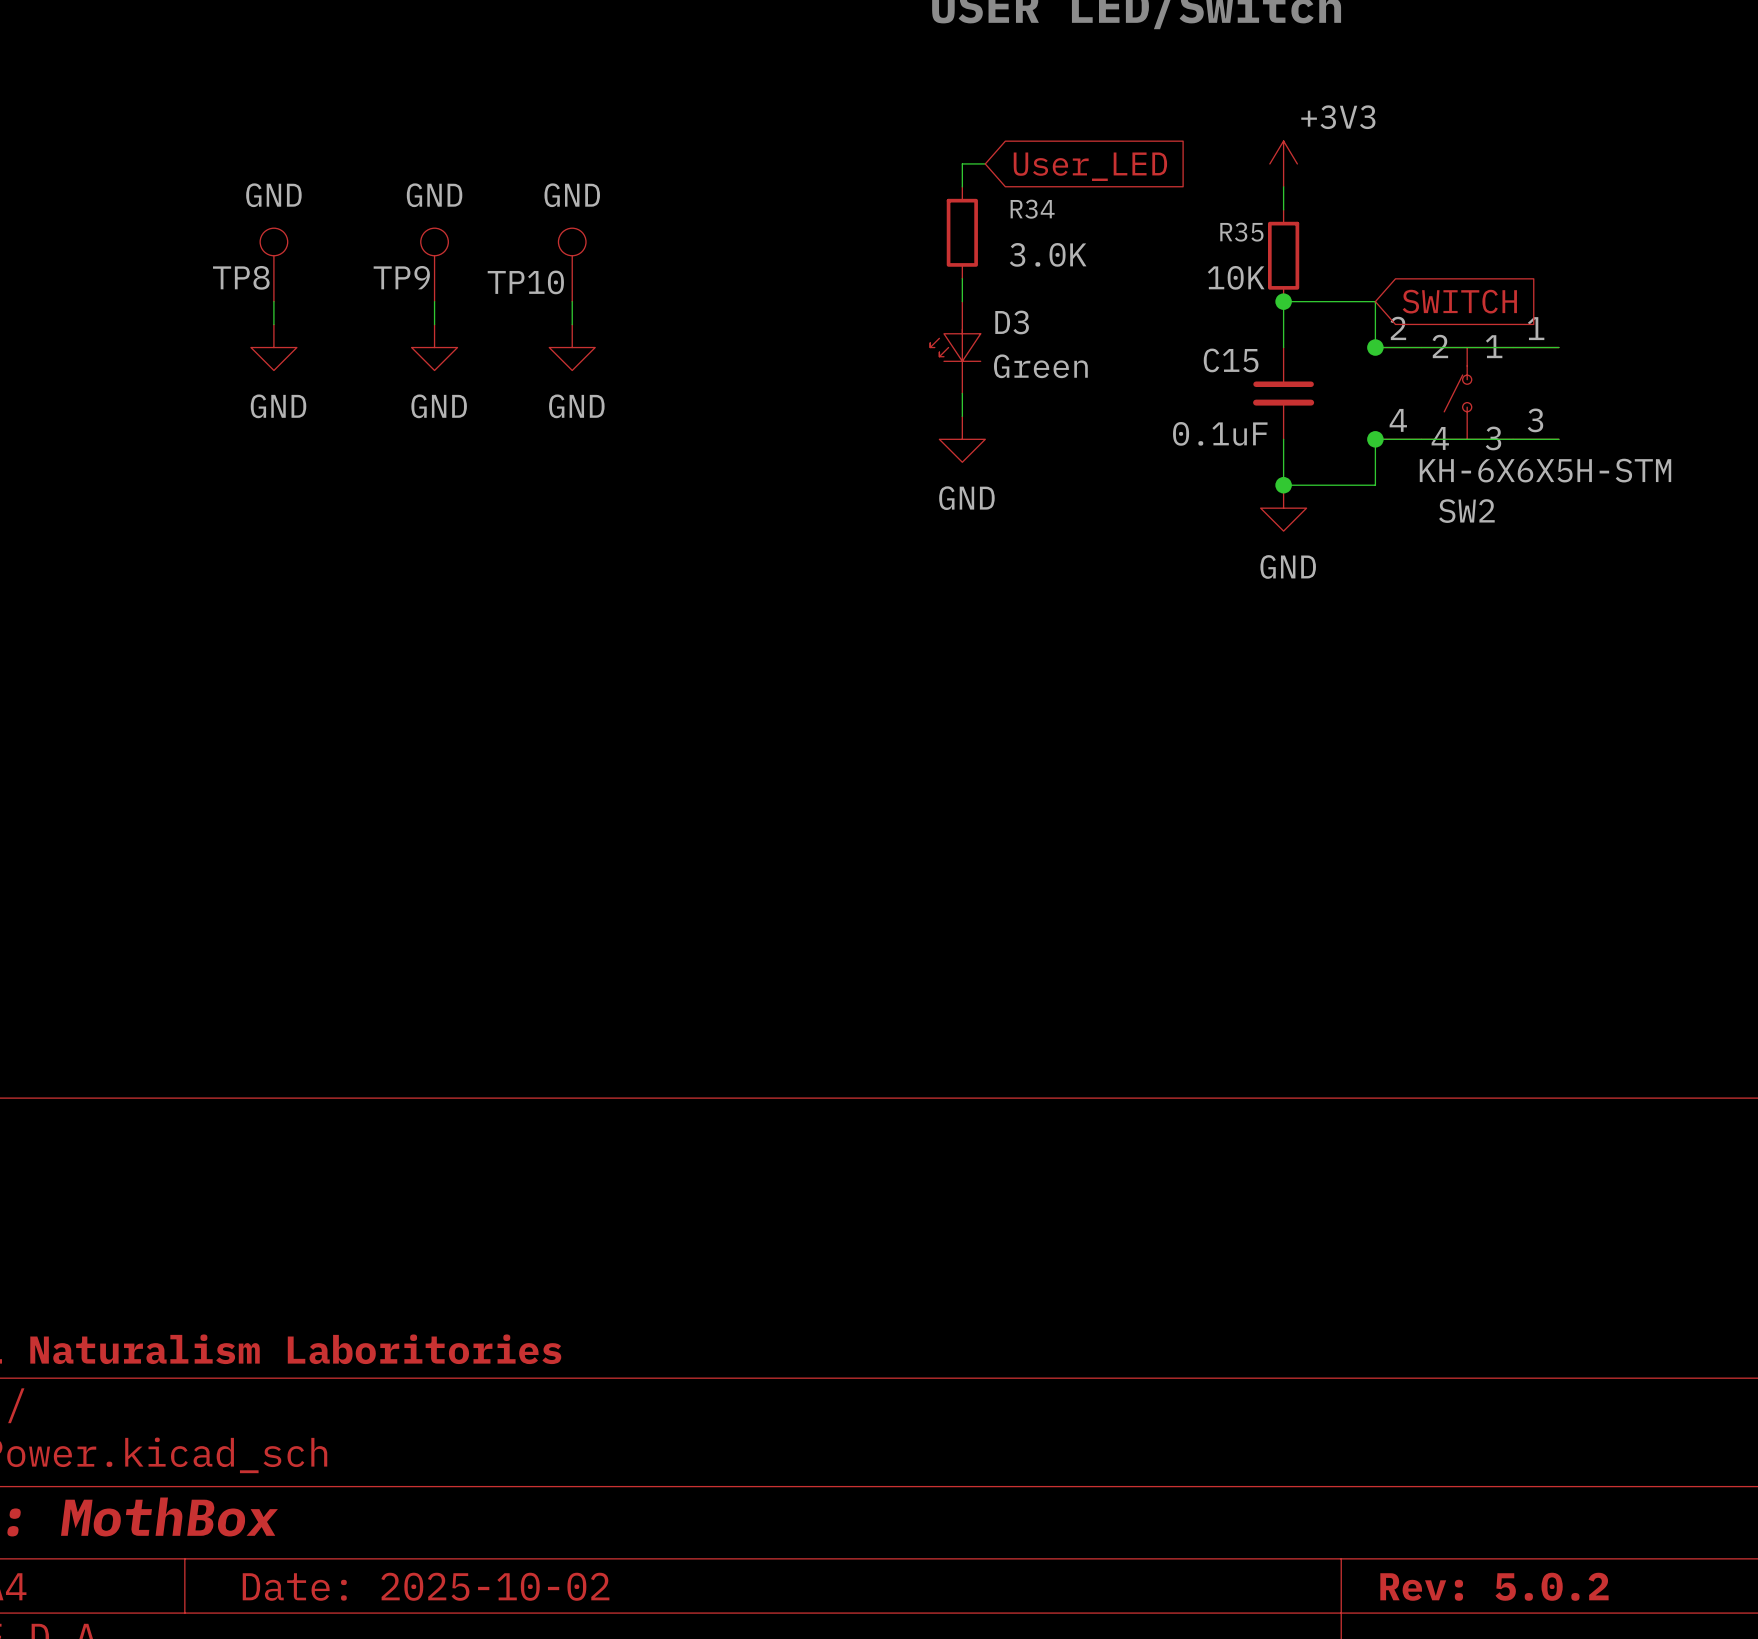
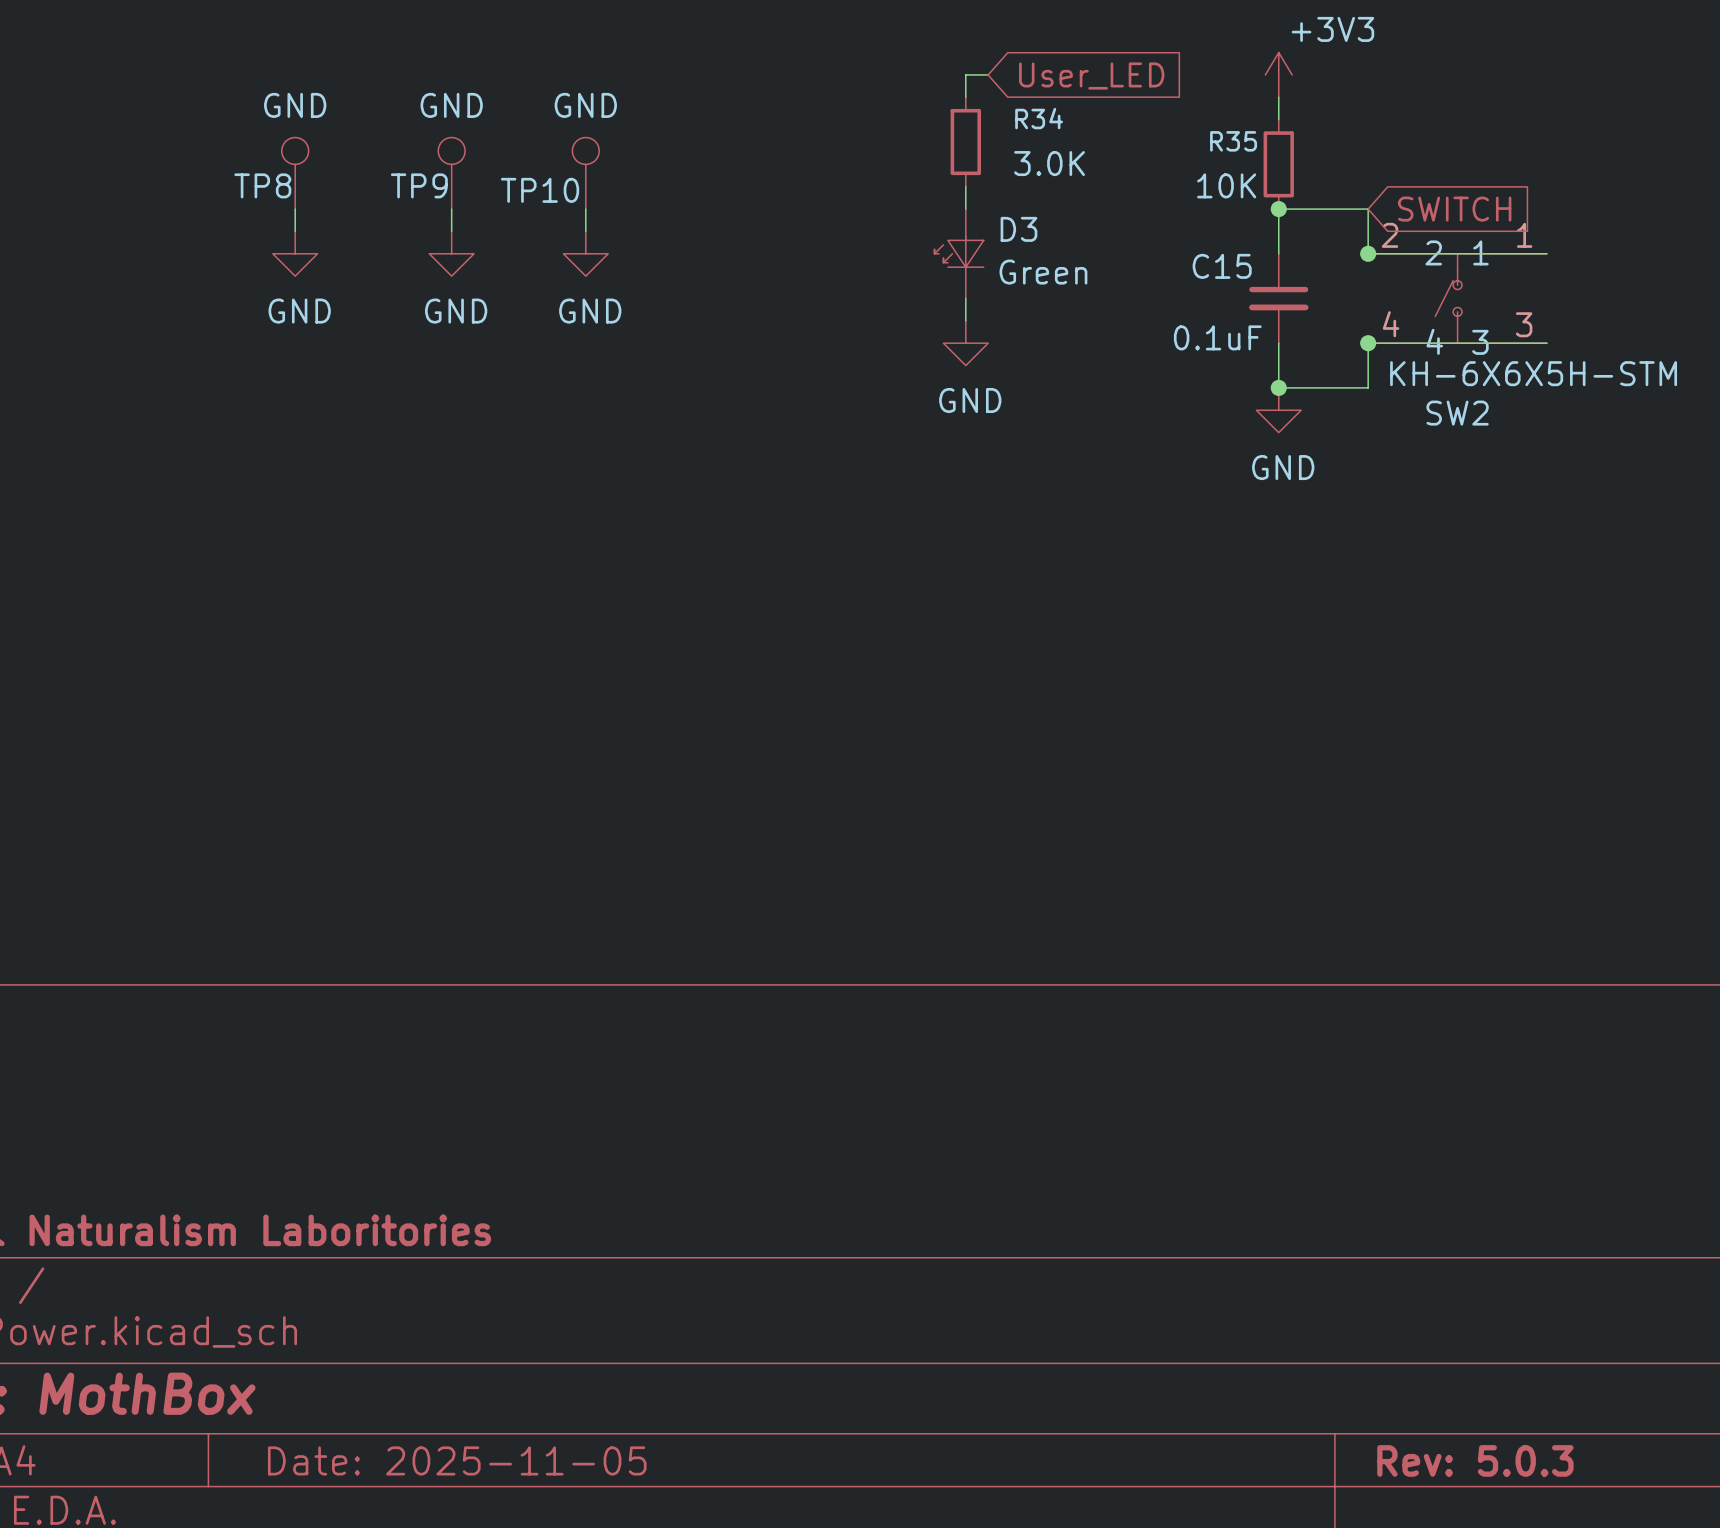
title block: Date: 2025-10-02 (426, 1586) -> Date: 2025-11-05 (457, 1460)
title block: Rev: 5.0.2 (1494, 1586) -> Rev: 5.0.3 (1475, 1460)

